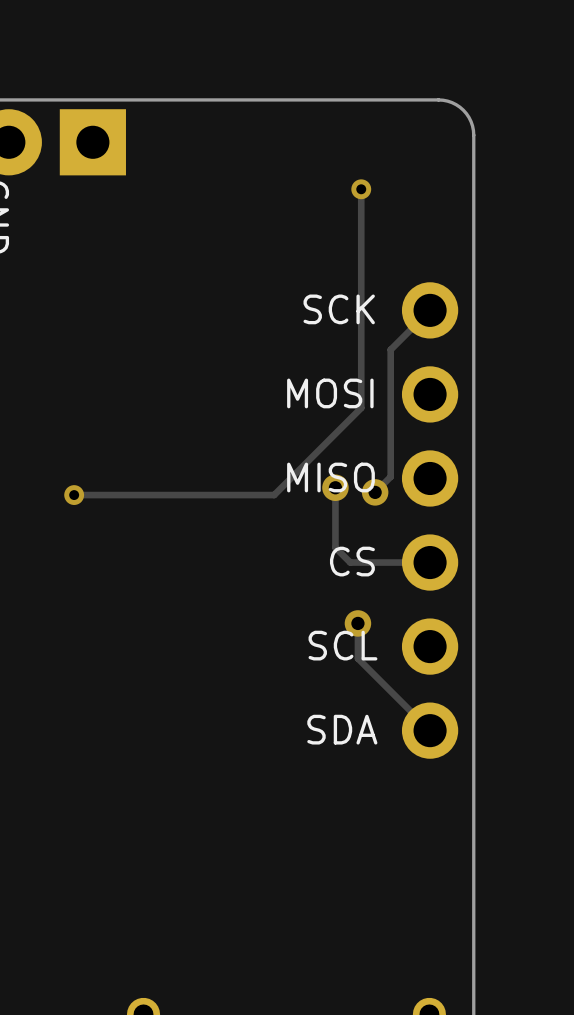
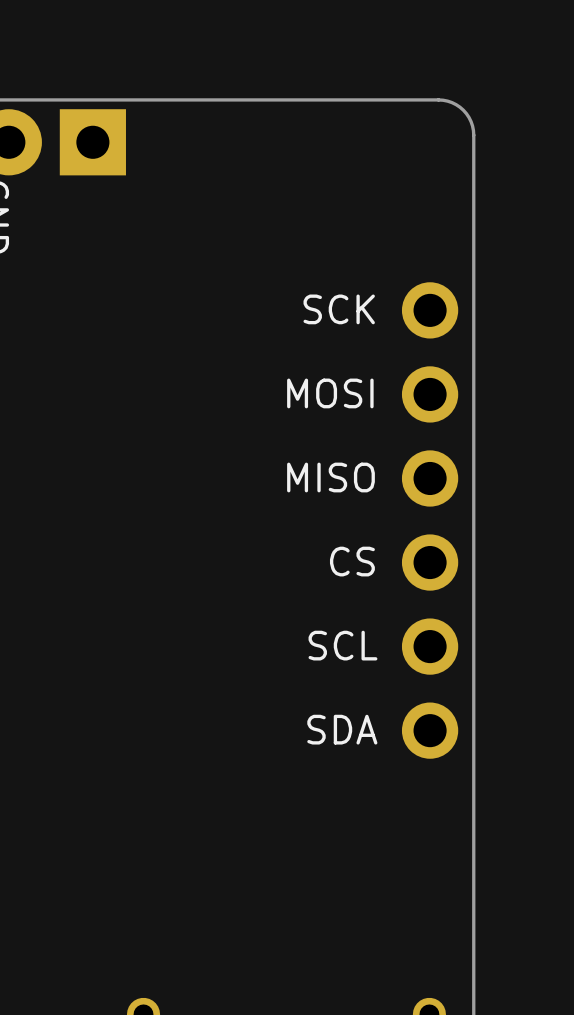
track: (361, 189) (361, 408) (274, 495) (74, 495) -> none
via: (361, 189) -> none
track: (430, 310) (390, 349) (390, 476) (375, 492) -> none
track: (335, 487) (335, 547) (350, 562) (430, 562) -> none
via: (335, 487) -> none
via: (375, 492) -> none
via: (74, 495) -> none
track: (357, 623) (357, 658) (430, 730) -> none
via: (357, 623) -> none

